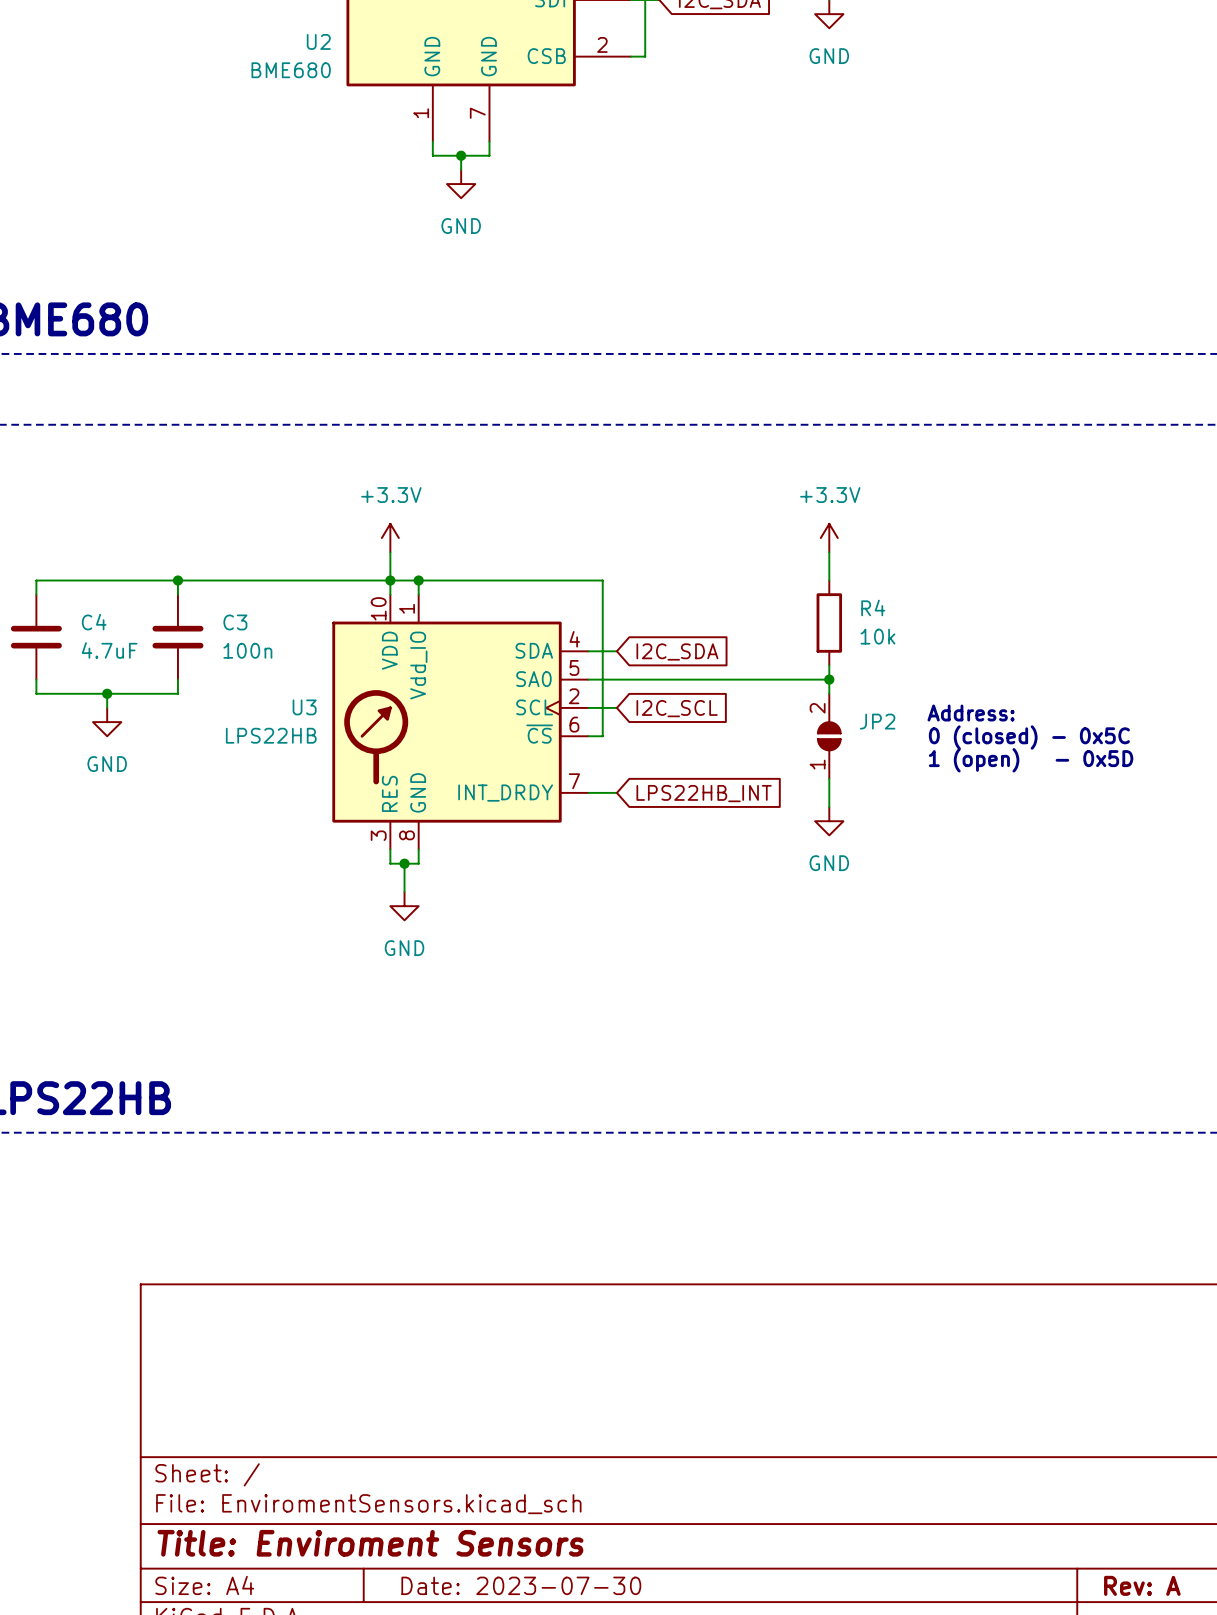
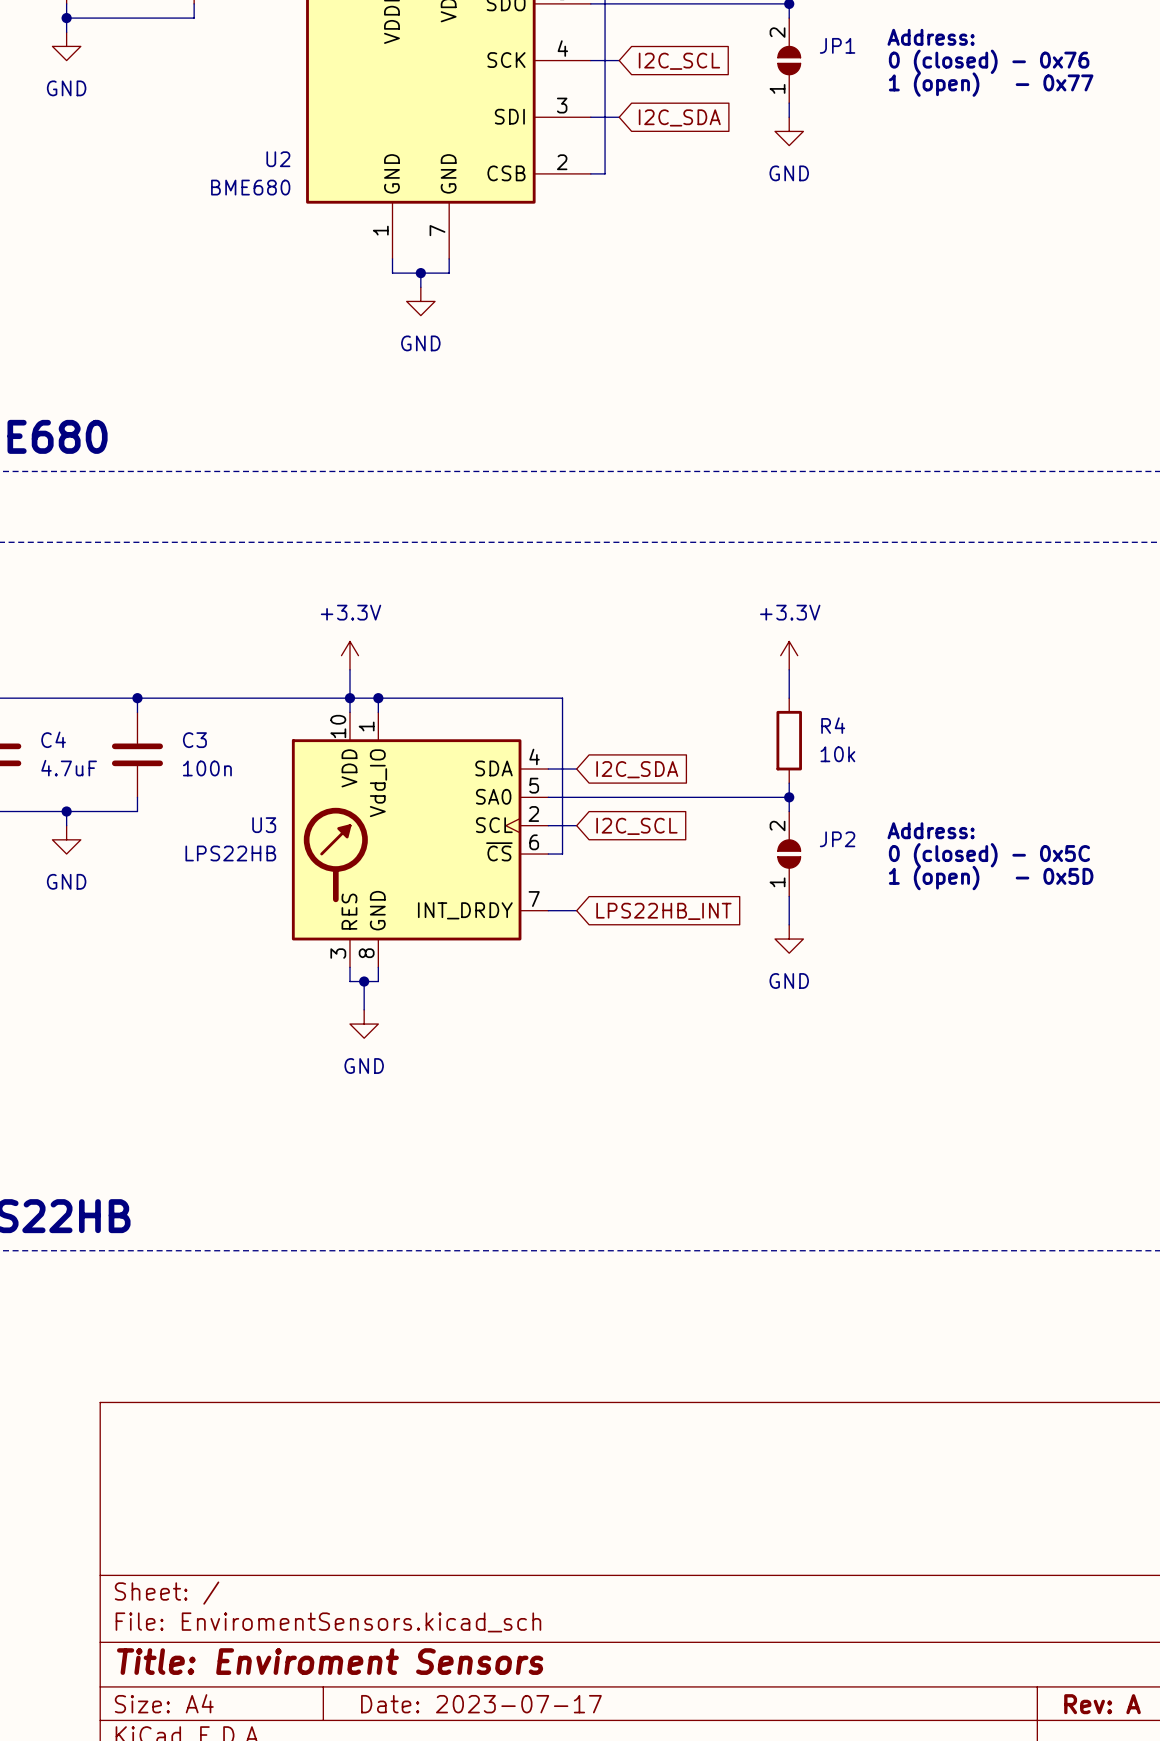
title block: Date: 2023-07-30 (521, 1585) -> Date: 2023-07-17 (481, 1704)

